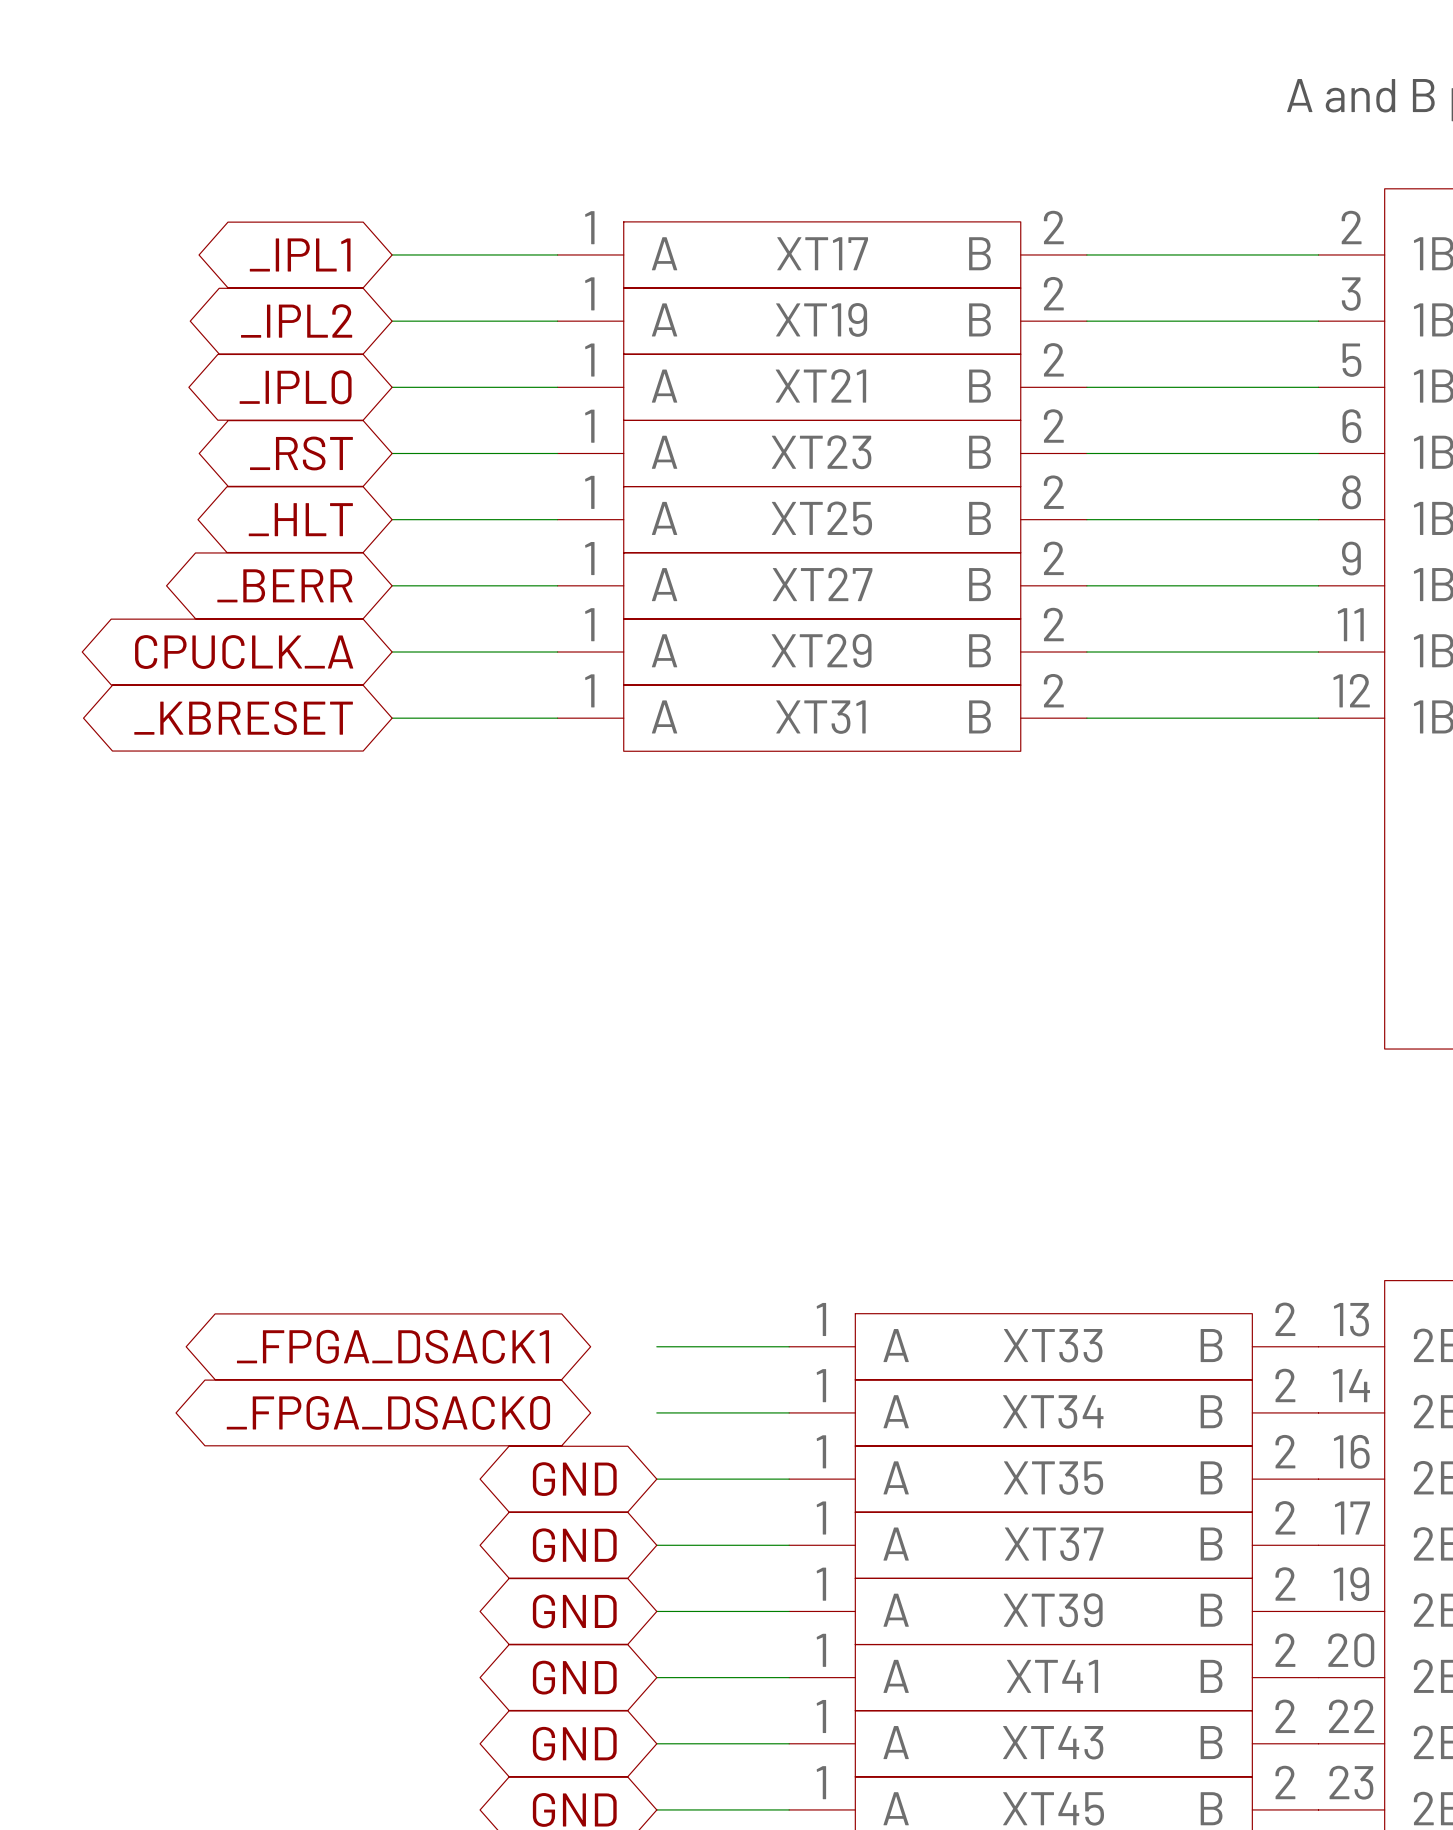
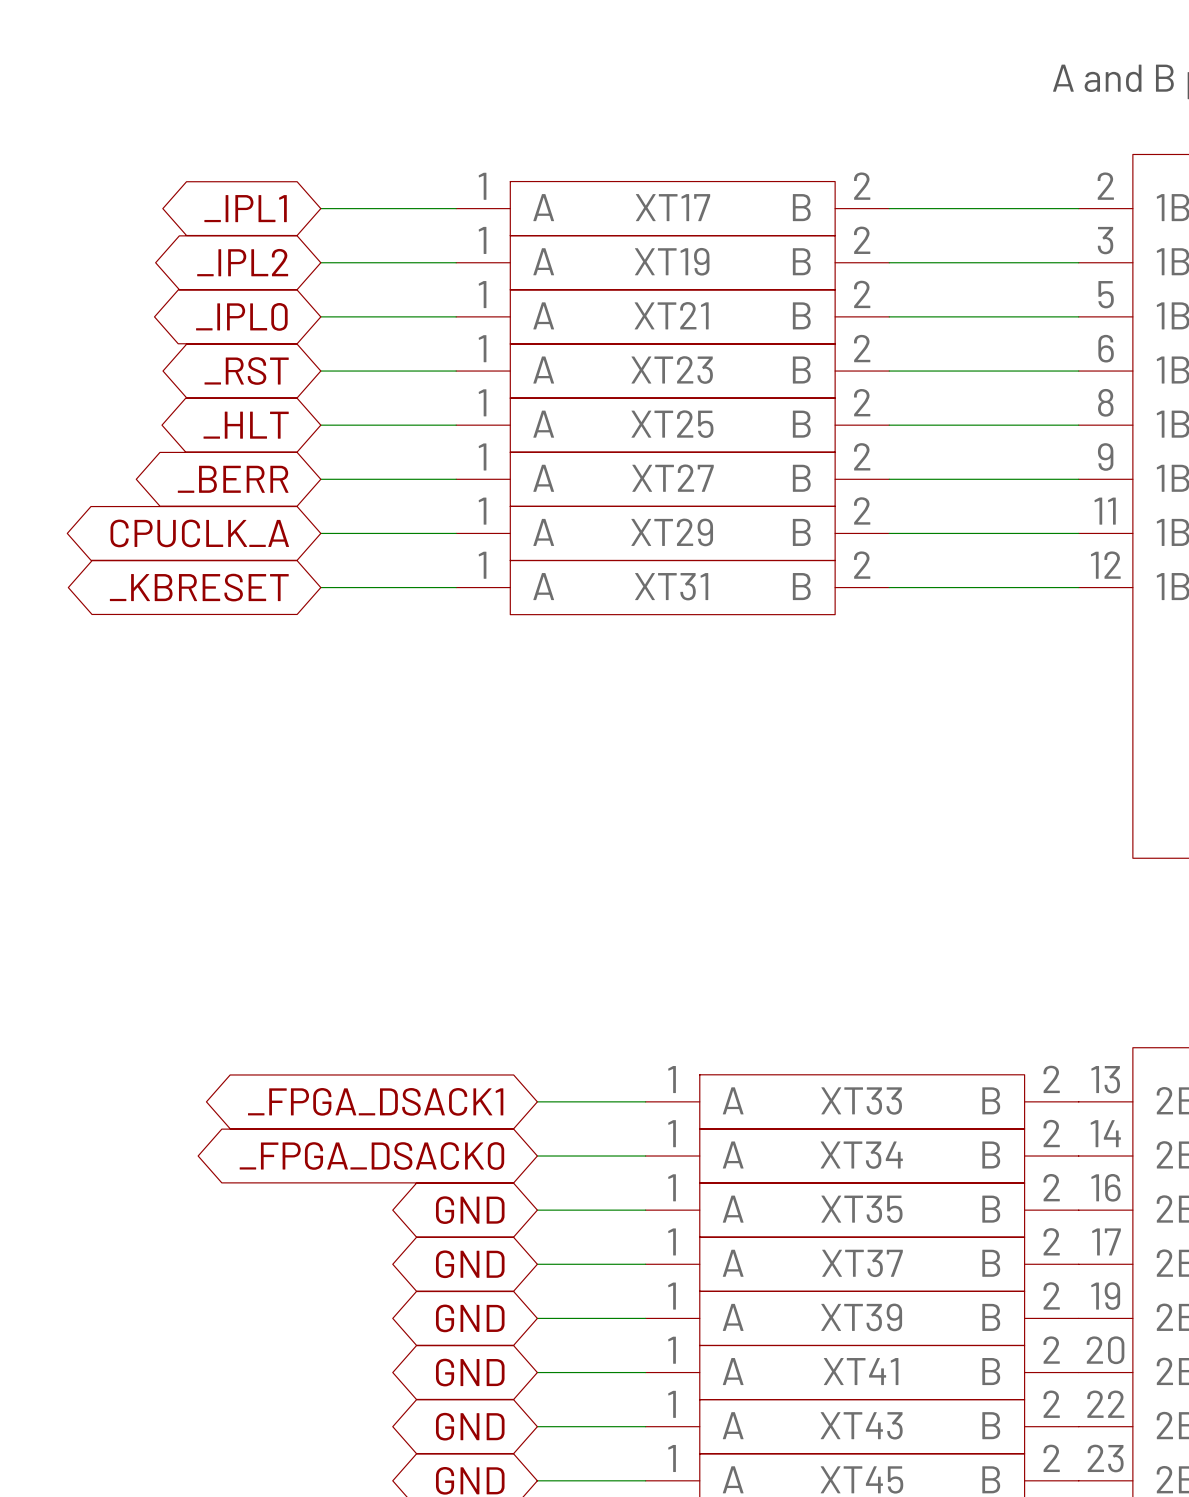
global label position: _FPGA_DSACK1 (392, 1346) -> _FPGA_DSACK1 (375, 1101)
global label position: _FPGA_DSACK0 (388, 1412) -> _FPGA_DSACK0 (371, 1156)

